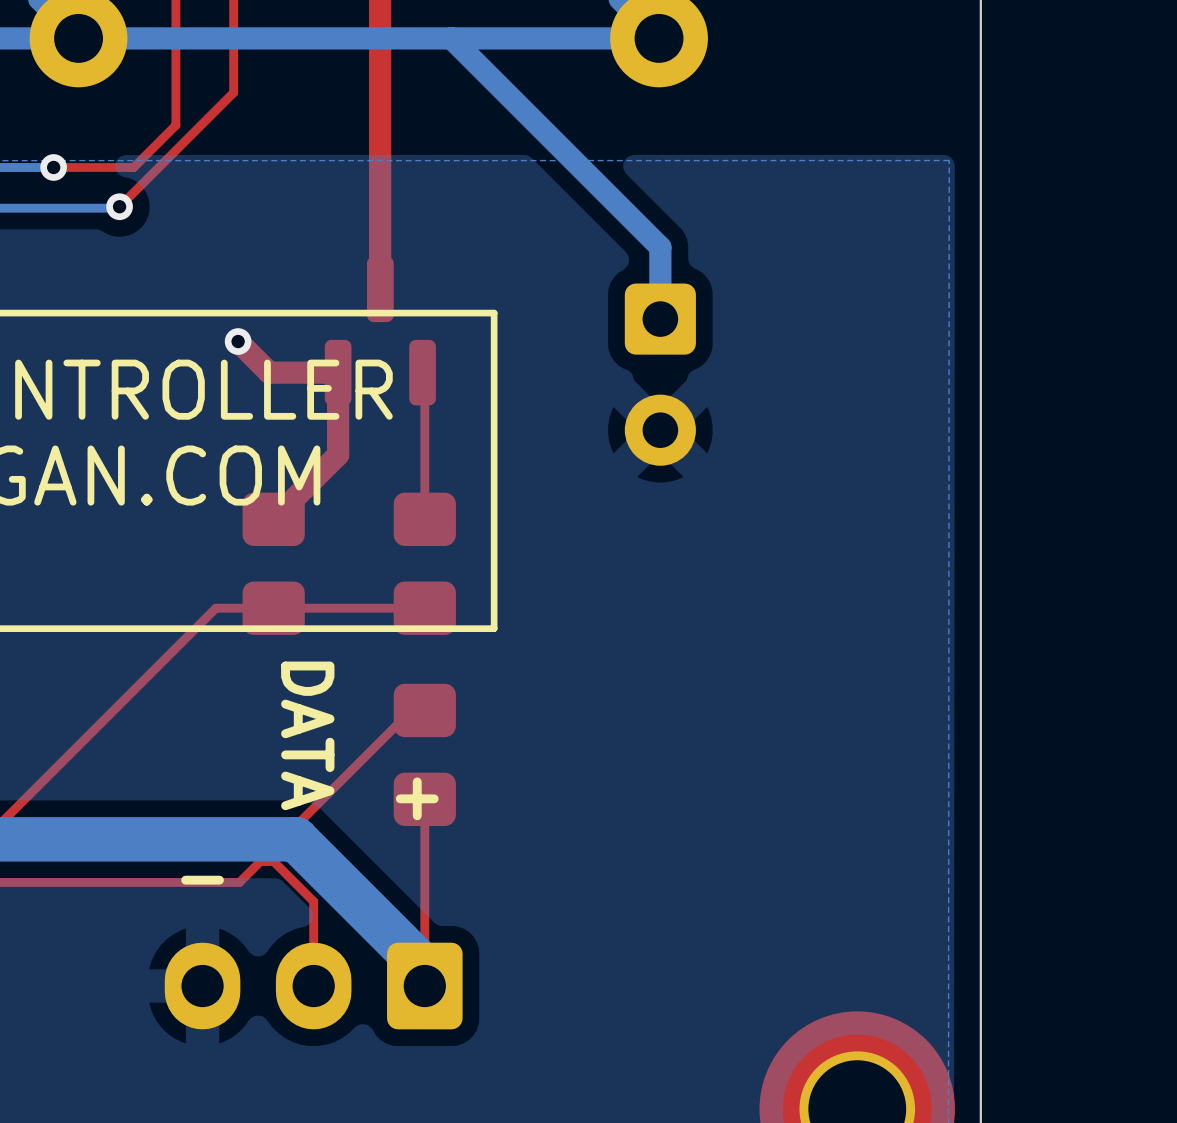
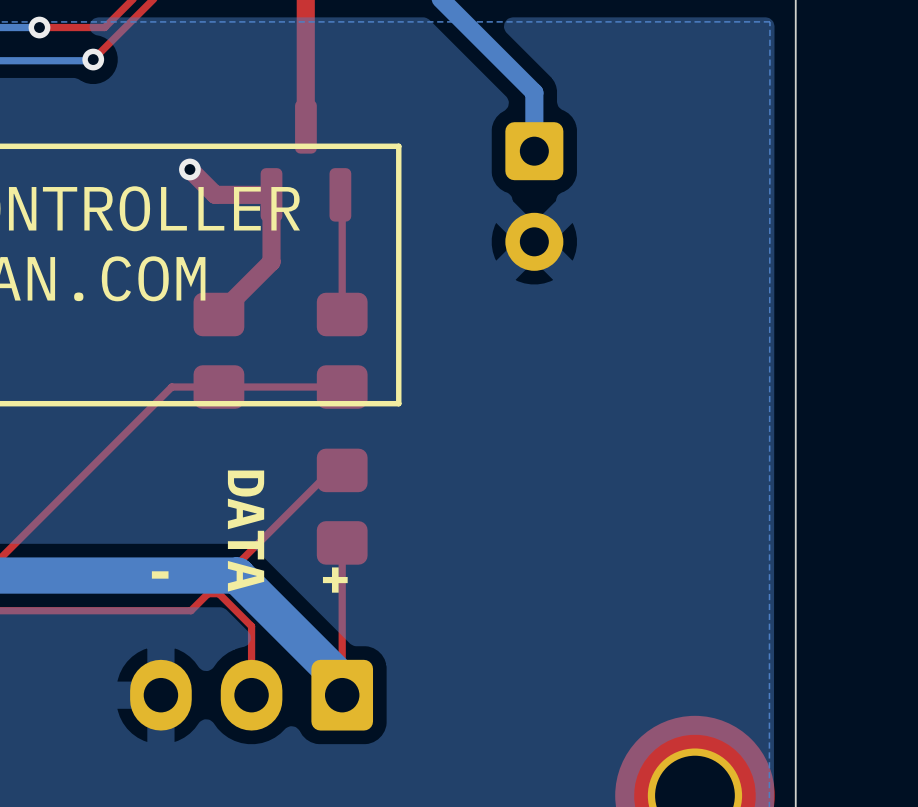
text position: DATA (307, 735) -> DATA (246, 531)
text position: + (417, 798) -> + (335, 580)
text position: - (202, 880) -> - (160, 574)

